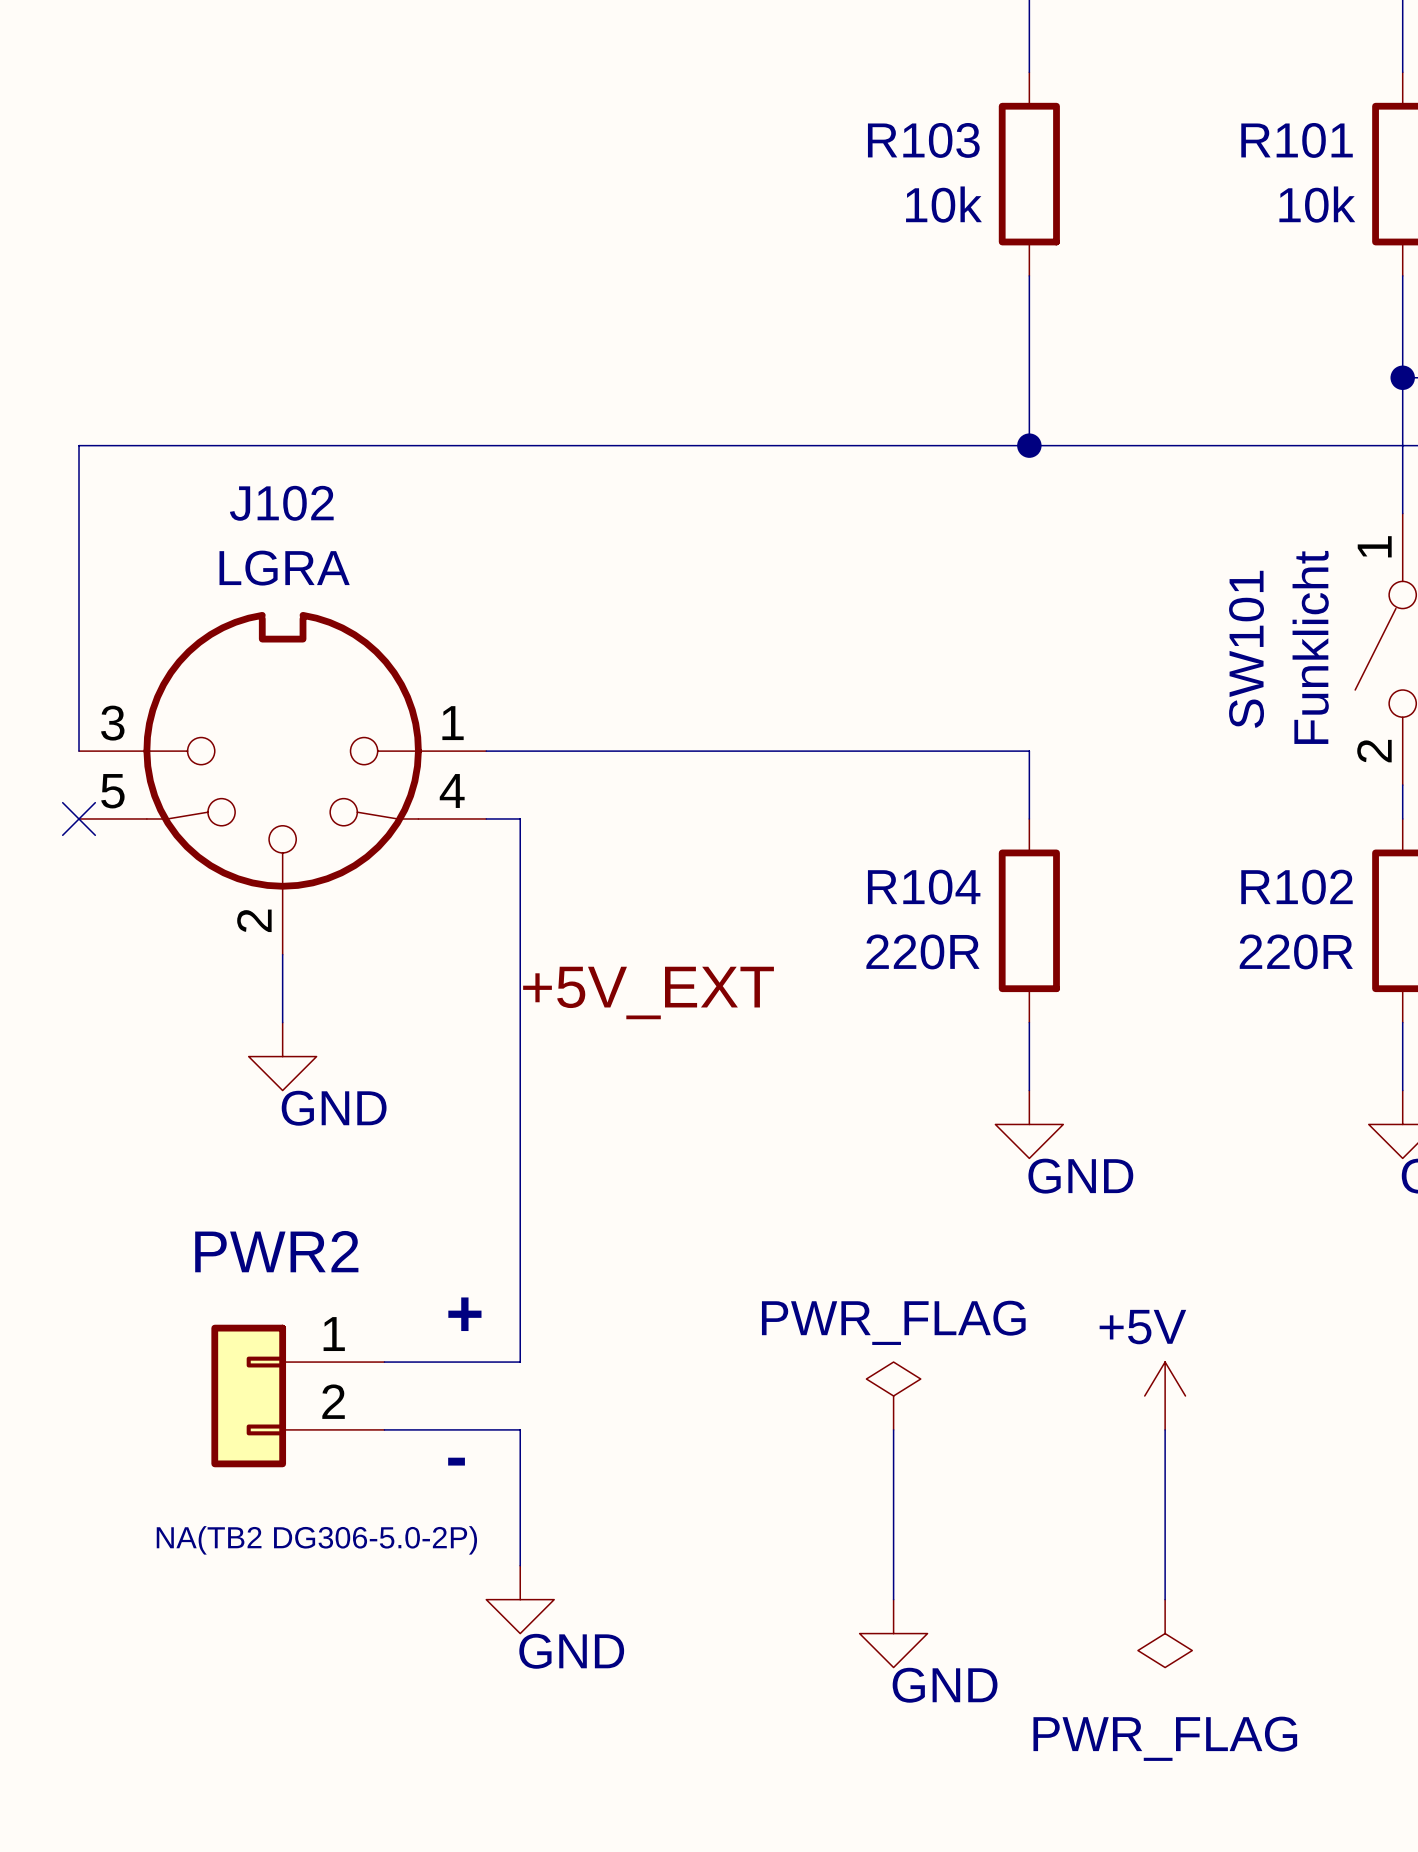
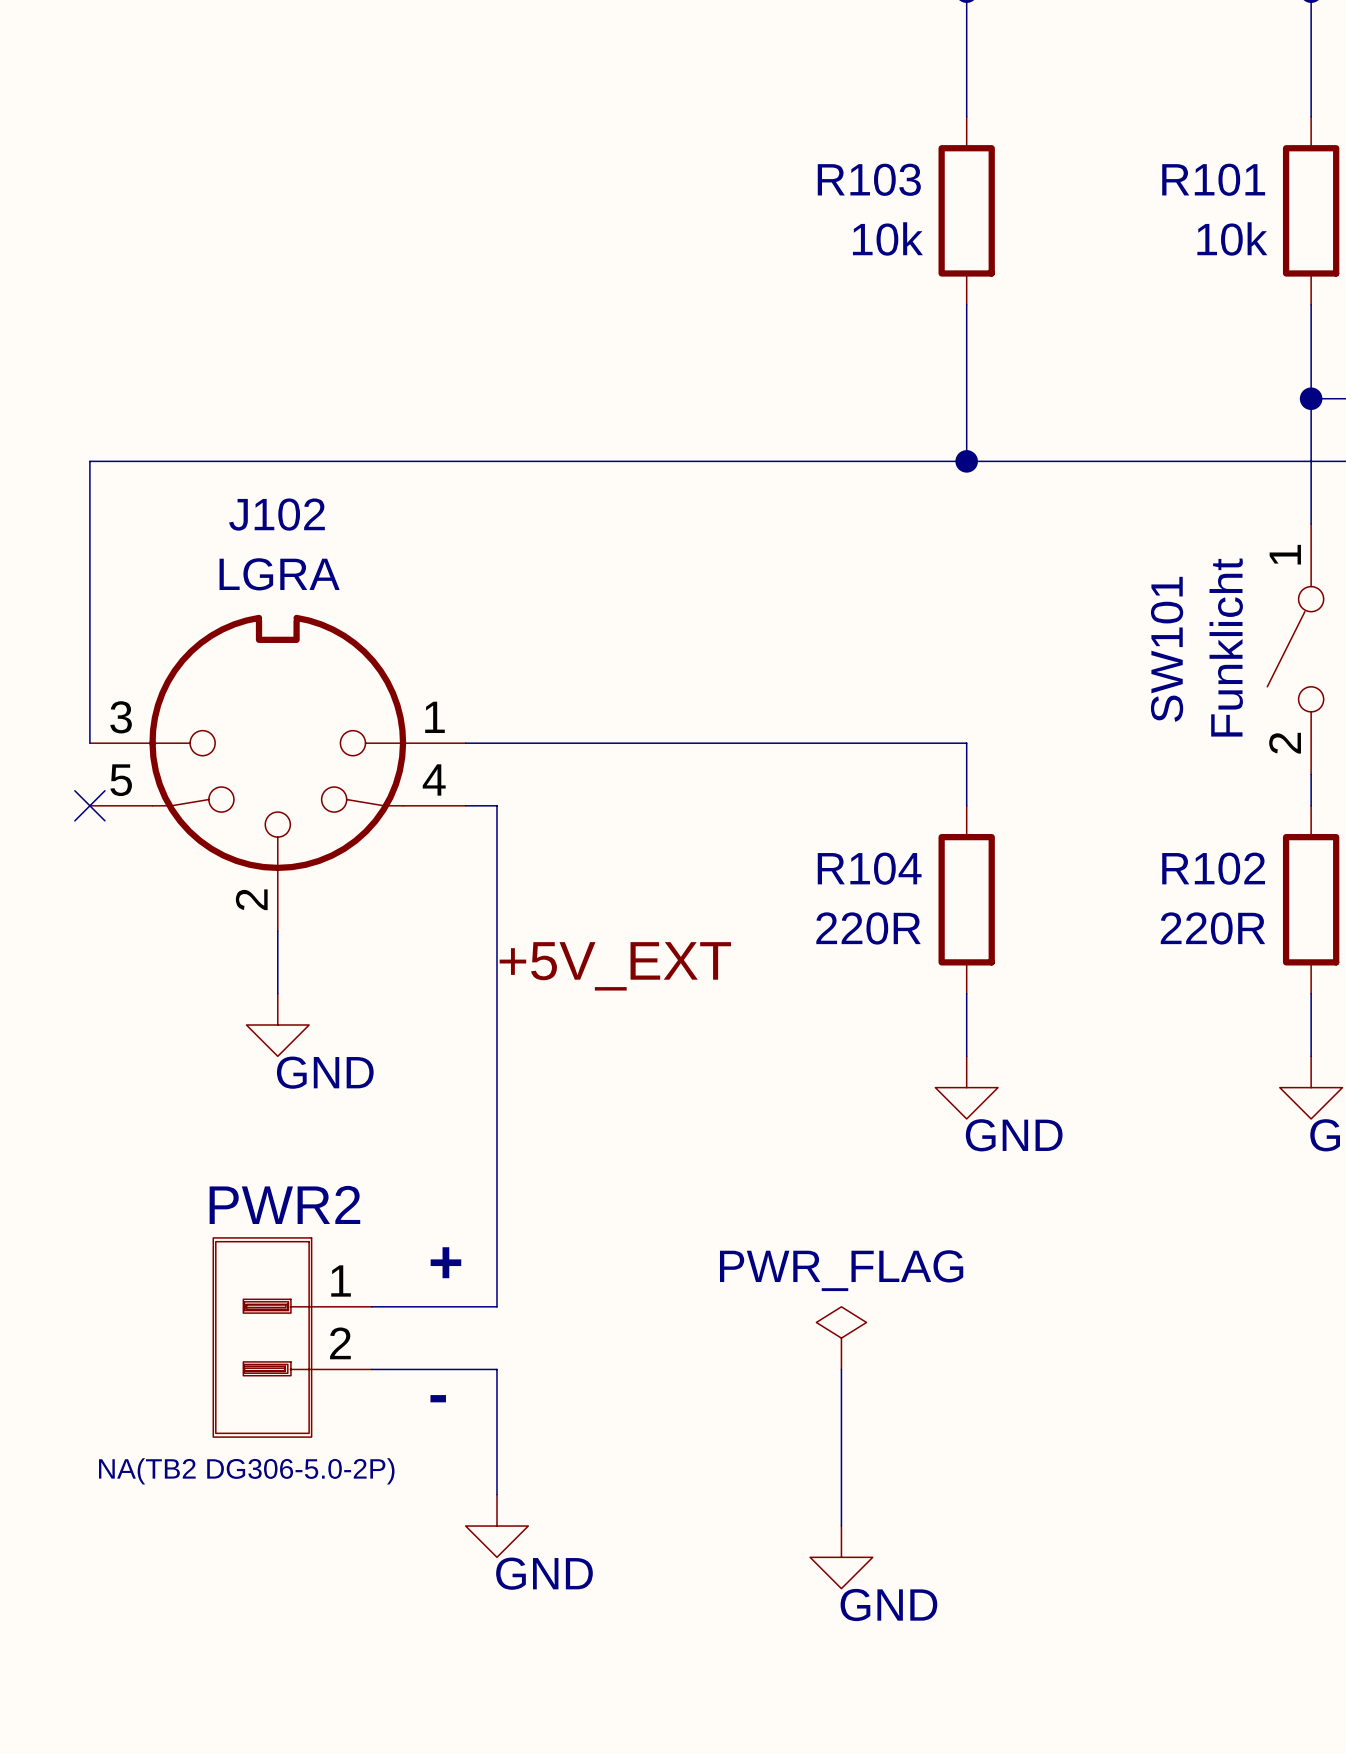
PWR2 symbol: [211, 1324, 385, 1468] -> [213, 1237, 372, 1438]
power symbol: +5V (1165, 1395) -> none
wire: (1165, 1429) (1165, 1599) -> none
PWR2 value position: NA(TB2 DG306-5.0-2P) (316, 1540) -> NA(TB2 DG306-5.0-2P) (246, 1471)
power symbol: PWR_FLAG (1165, 1633) -> none

